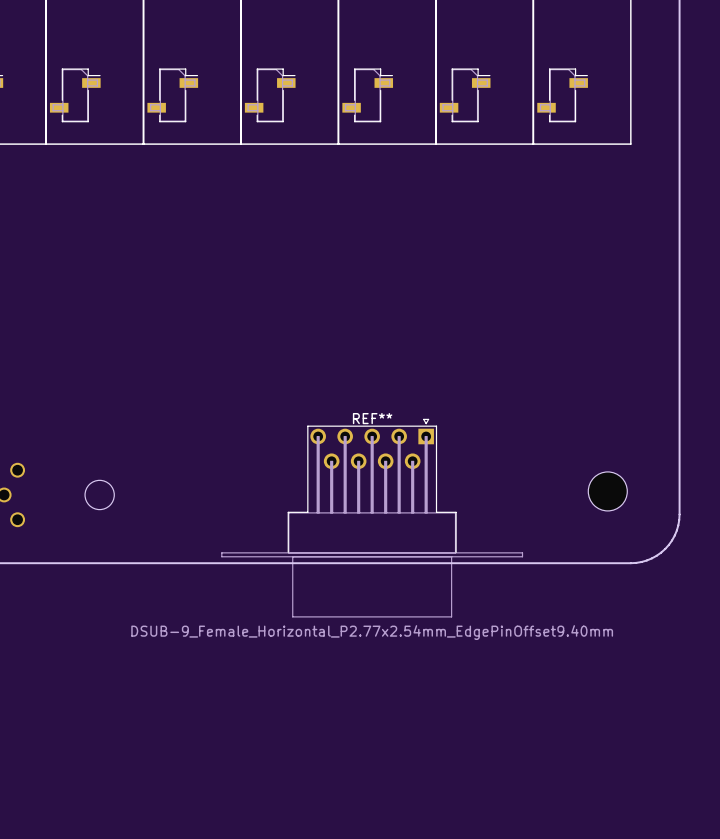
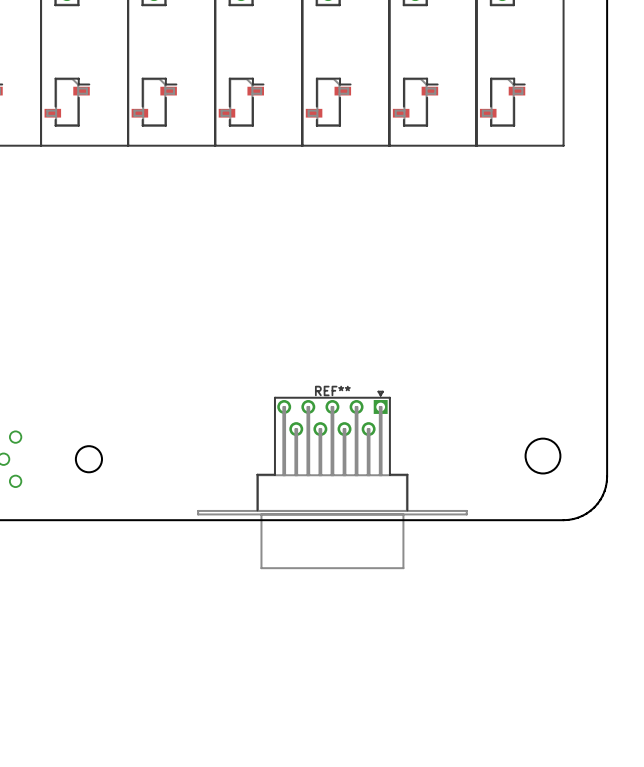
REF** value: DSUB-9_Female_Horizontal_P2.77x2.54mm_EdgePinOffset9.40mm (372, 632) -> none

